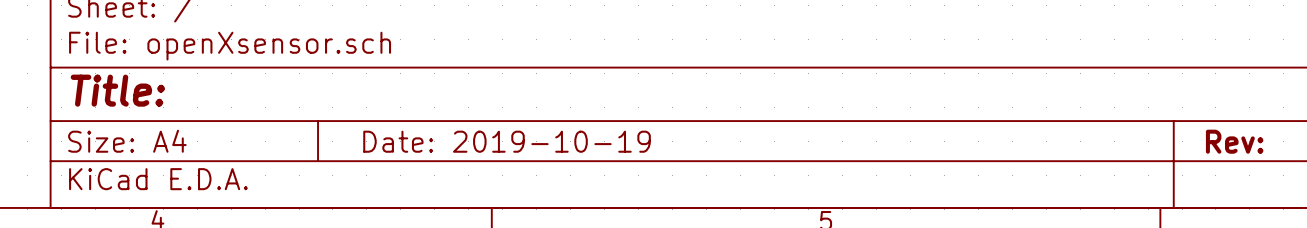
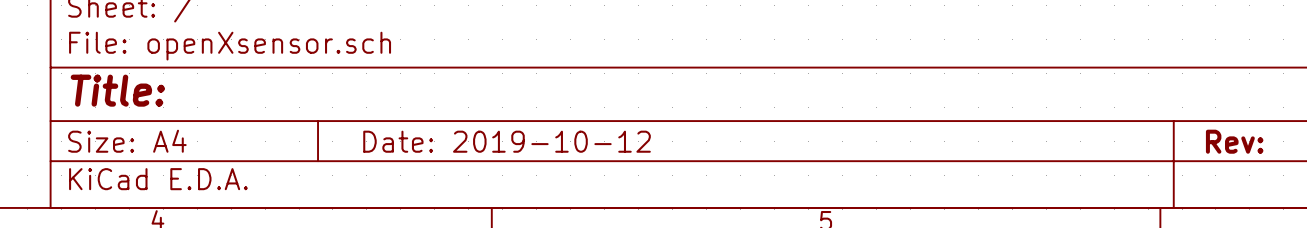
title block: Date: 2019-10-19 (507, 141) -> Date: 2019-10-12 (507, 141)

